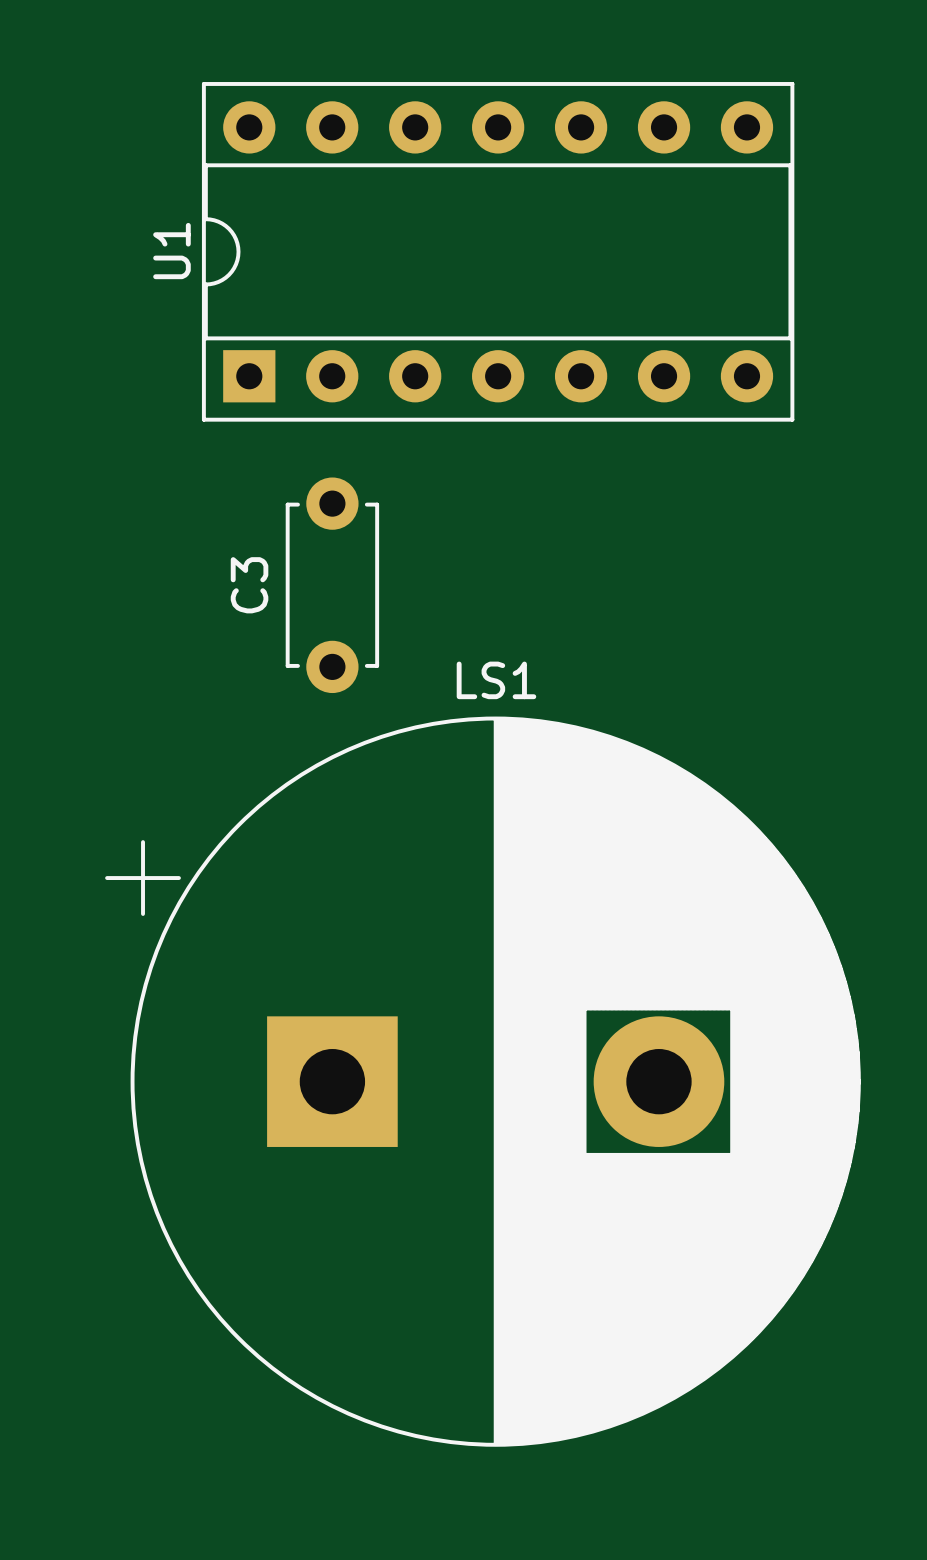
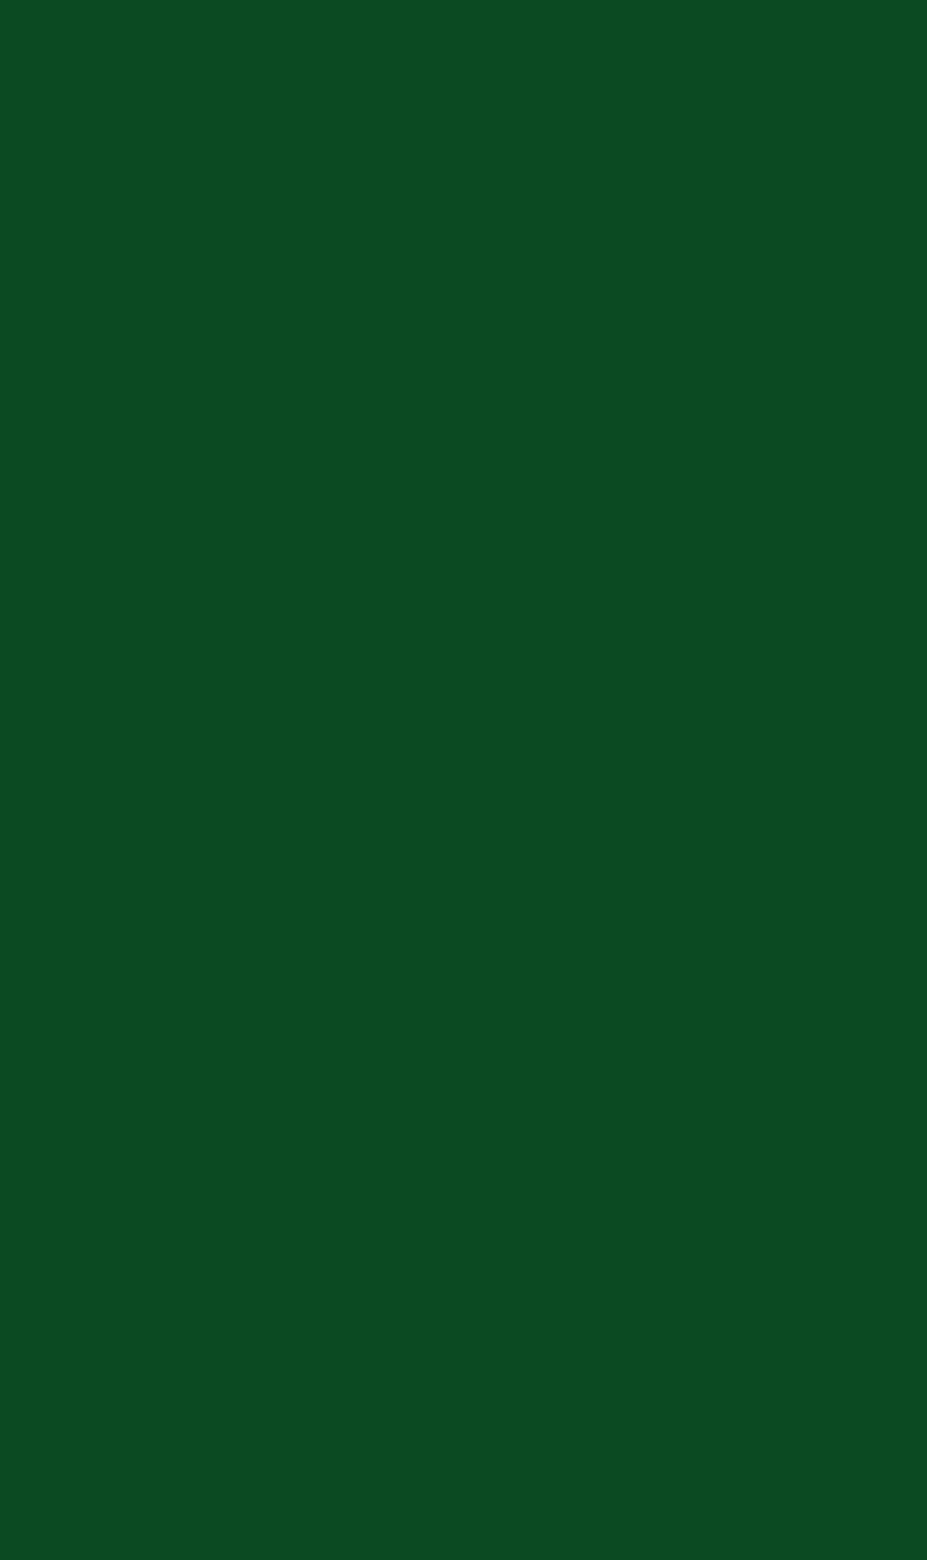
U1: (498, 251) -> none
C3: (332, 585) -> none
LS1: (482, 1081) -> none

